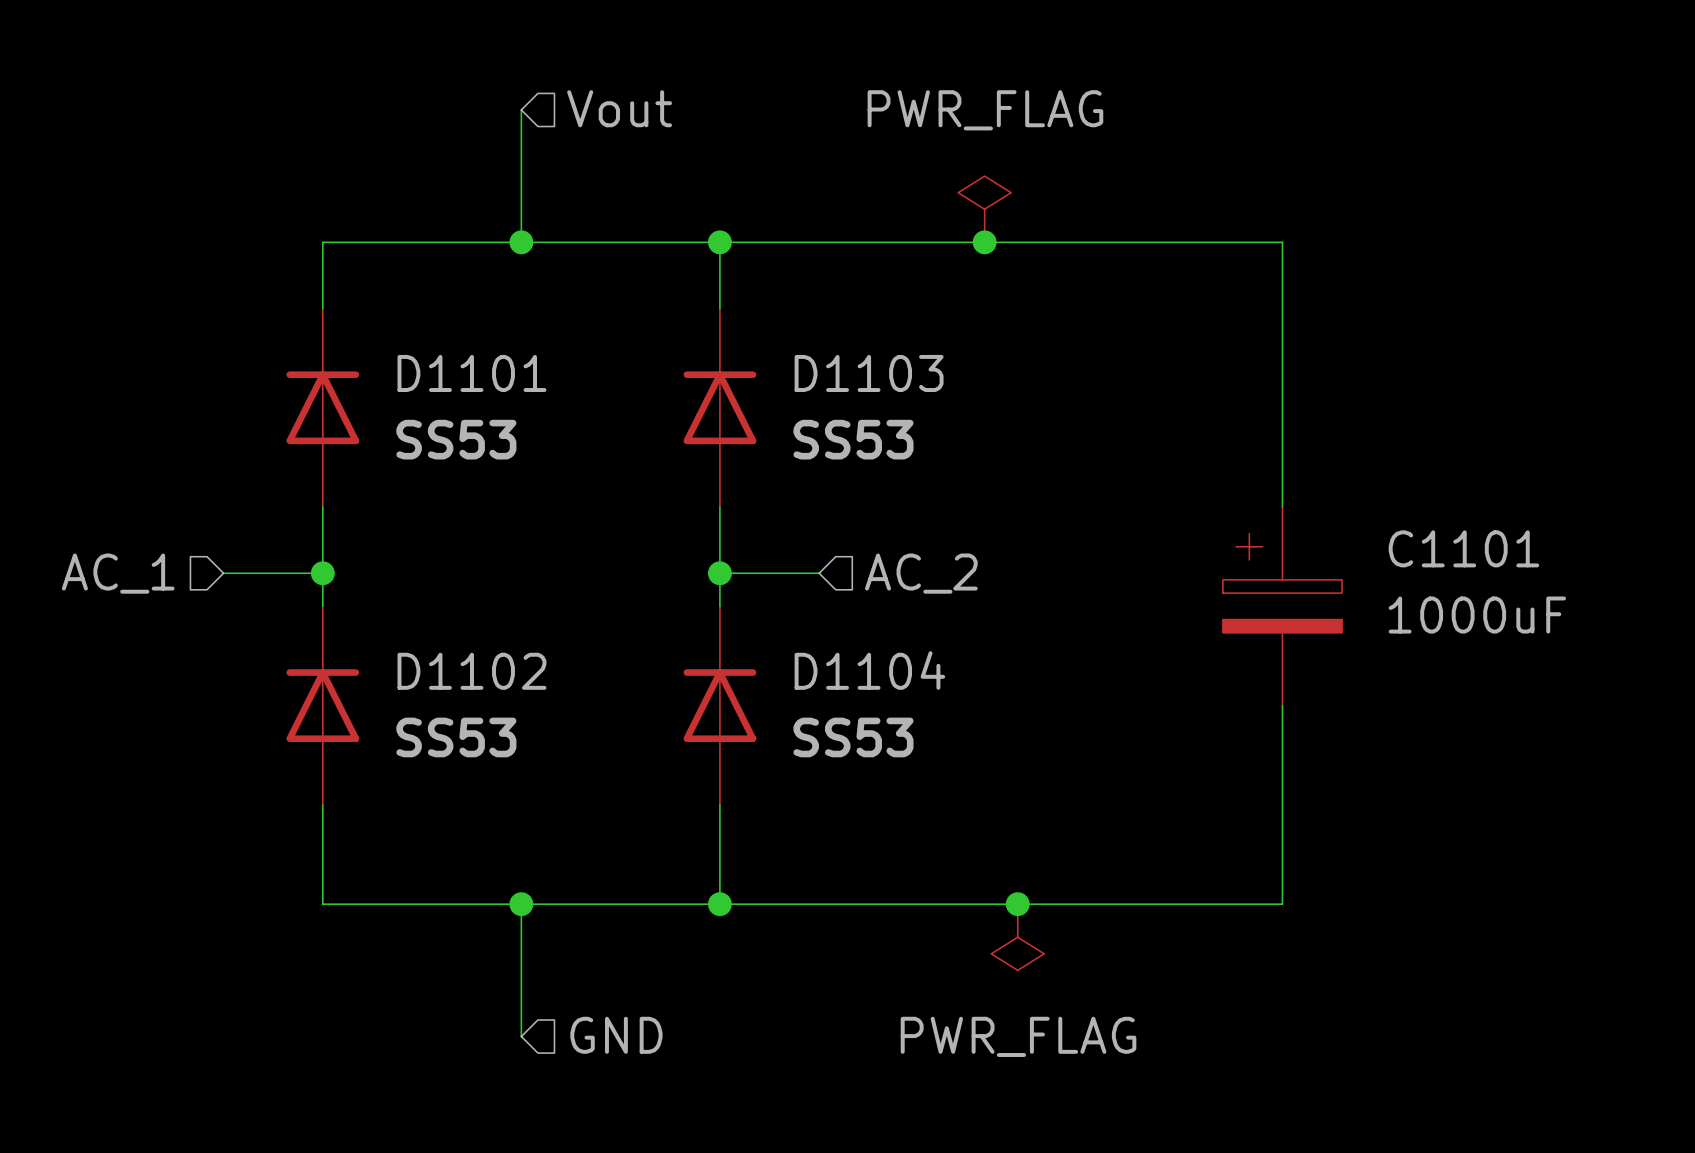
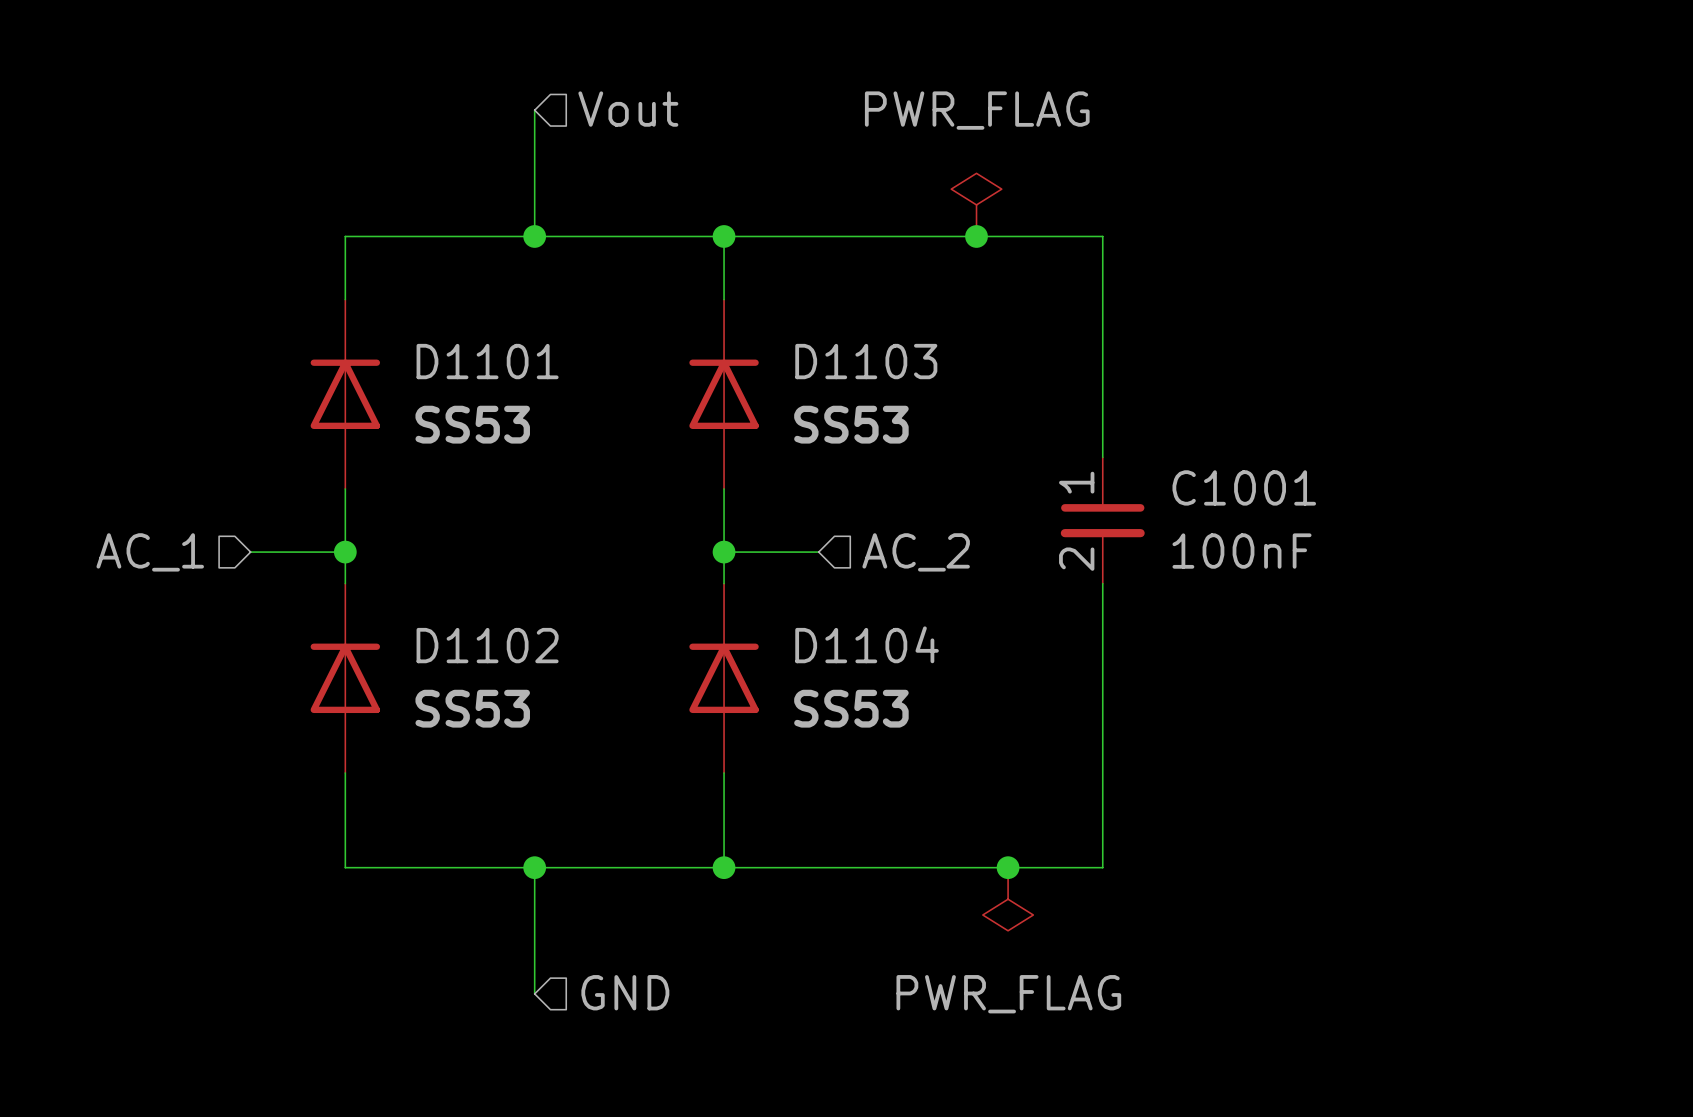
wire: (1117, 242) (1282, 242) (1282, 507) -> (1102, 236) (1102, 457)
C1001: none -> 100nF (1102, 520)
C1101: 1000uF (1282, 606) -> none
wire: (1282, 705) (1282, 904) (1117, 904) -> (1102, 583) (1102, 867)

